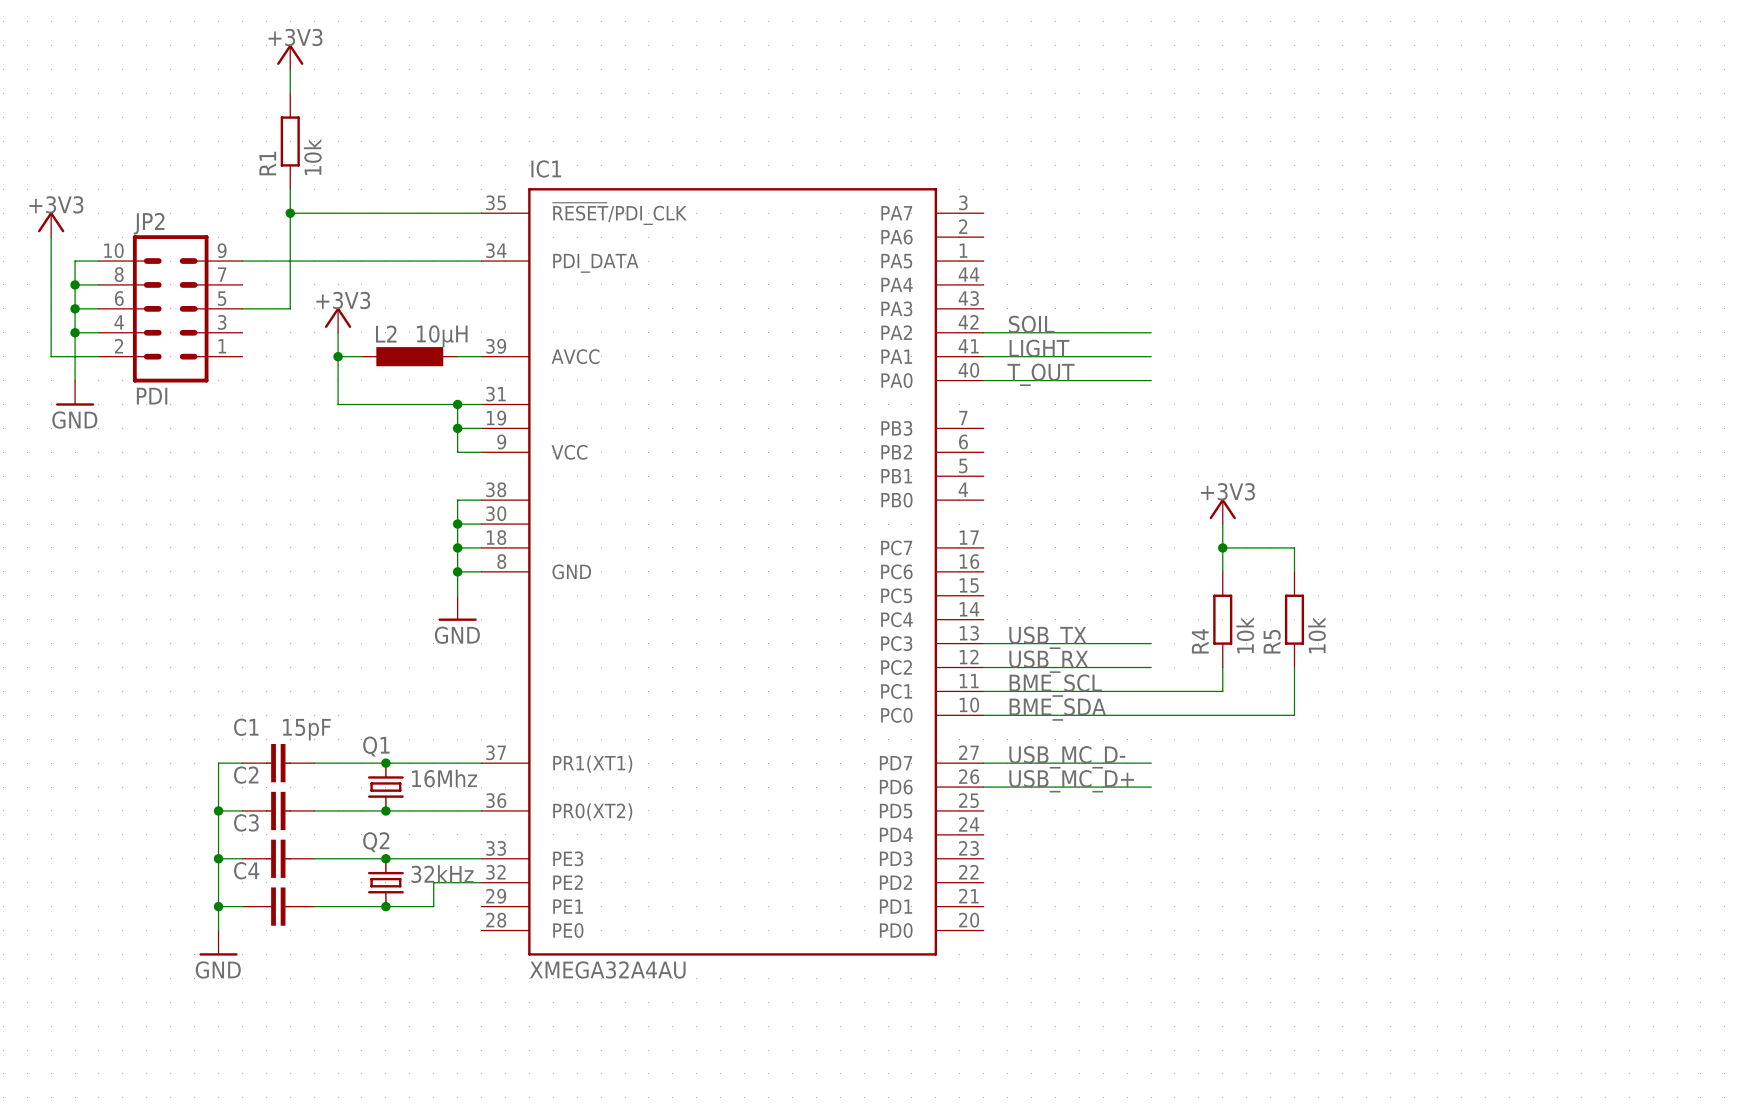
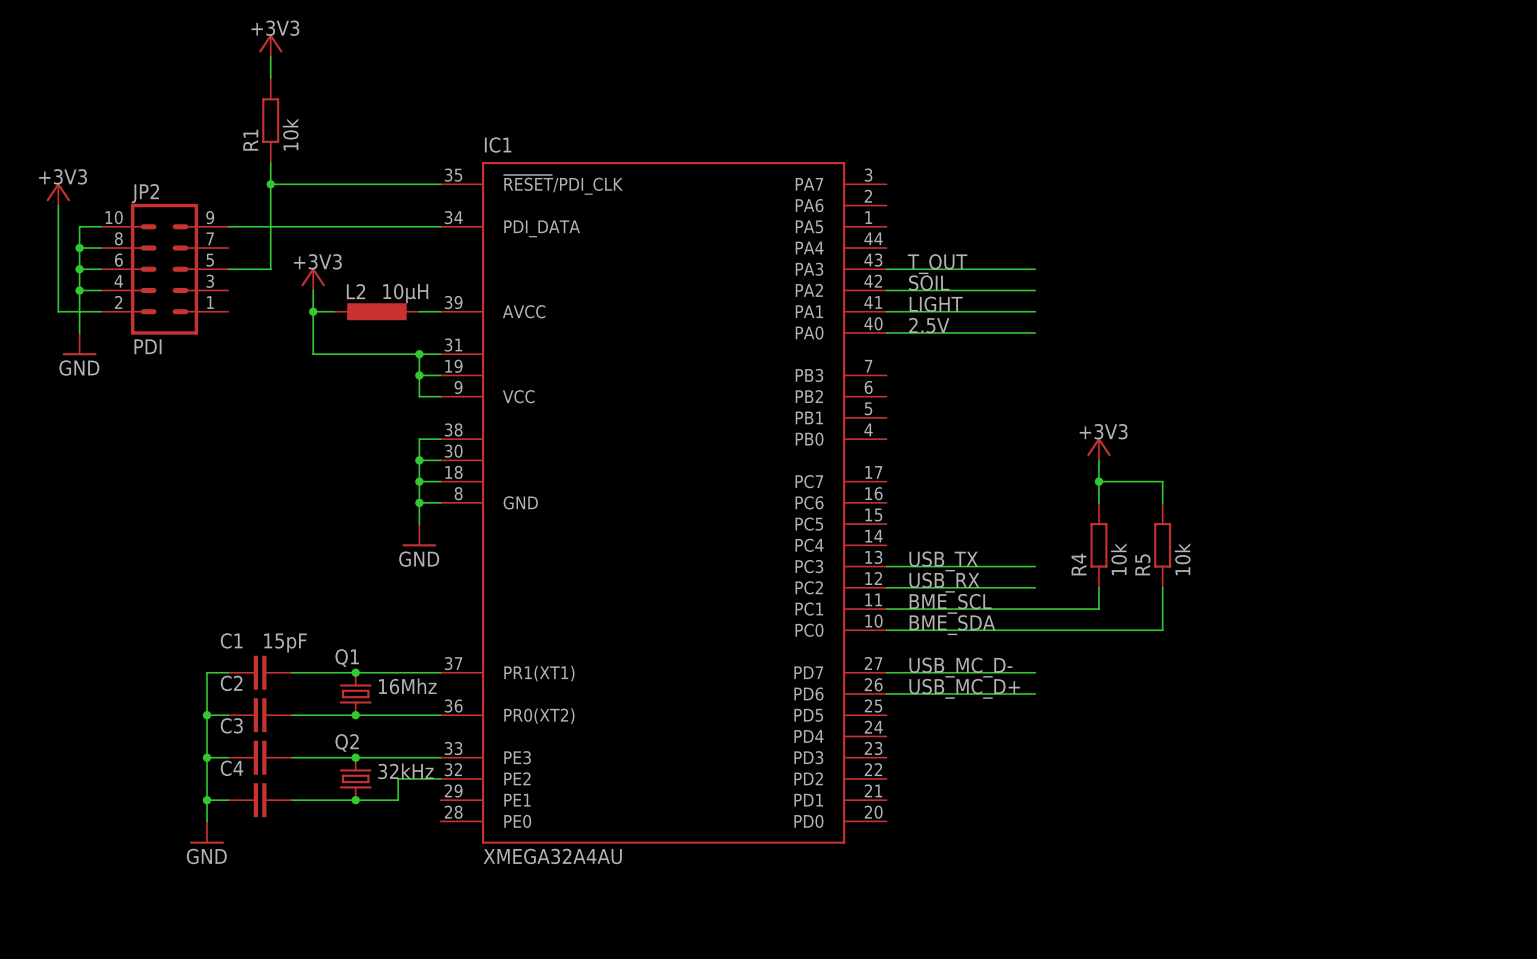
label: none -> T_OUT (937, 264)
wire: none -> (886, 269) (1035, 269)
label: T_OUT (1041, 374) -> 2.5V (929, 325)

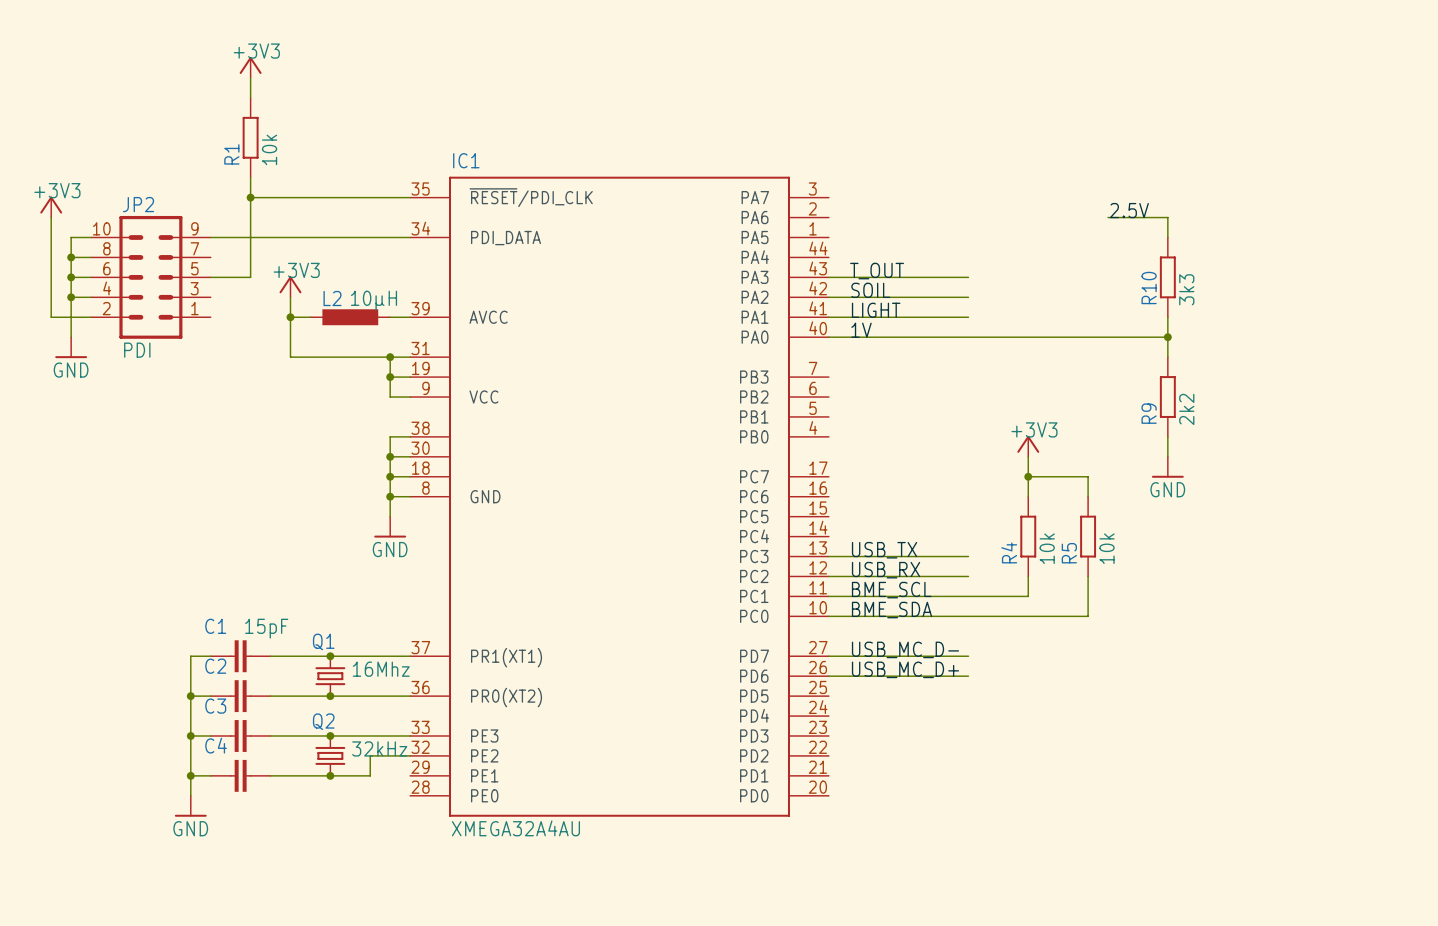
label: none -> 2.5V (1129, 210)
wire: none -> (1108, 217) (1167, 217) (1167, 237)
R10: none -> 3k3 (1167, 277)
wire: none -> (1167, 317) (1167, 357)
label: 2.5V (929, 325) -> 1V (861, 330)
wire: none -> (968, 337) (1167, 337)
junction: none -> (1167, 337)
R9: none -> 2k2 (1167, 397)
wire: none -> (1167, 436) (1167, 456)
power symbol: none -> GND (1167, 467)

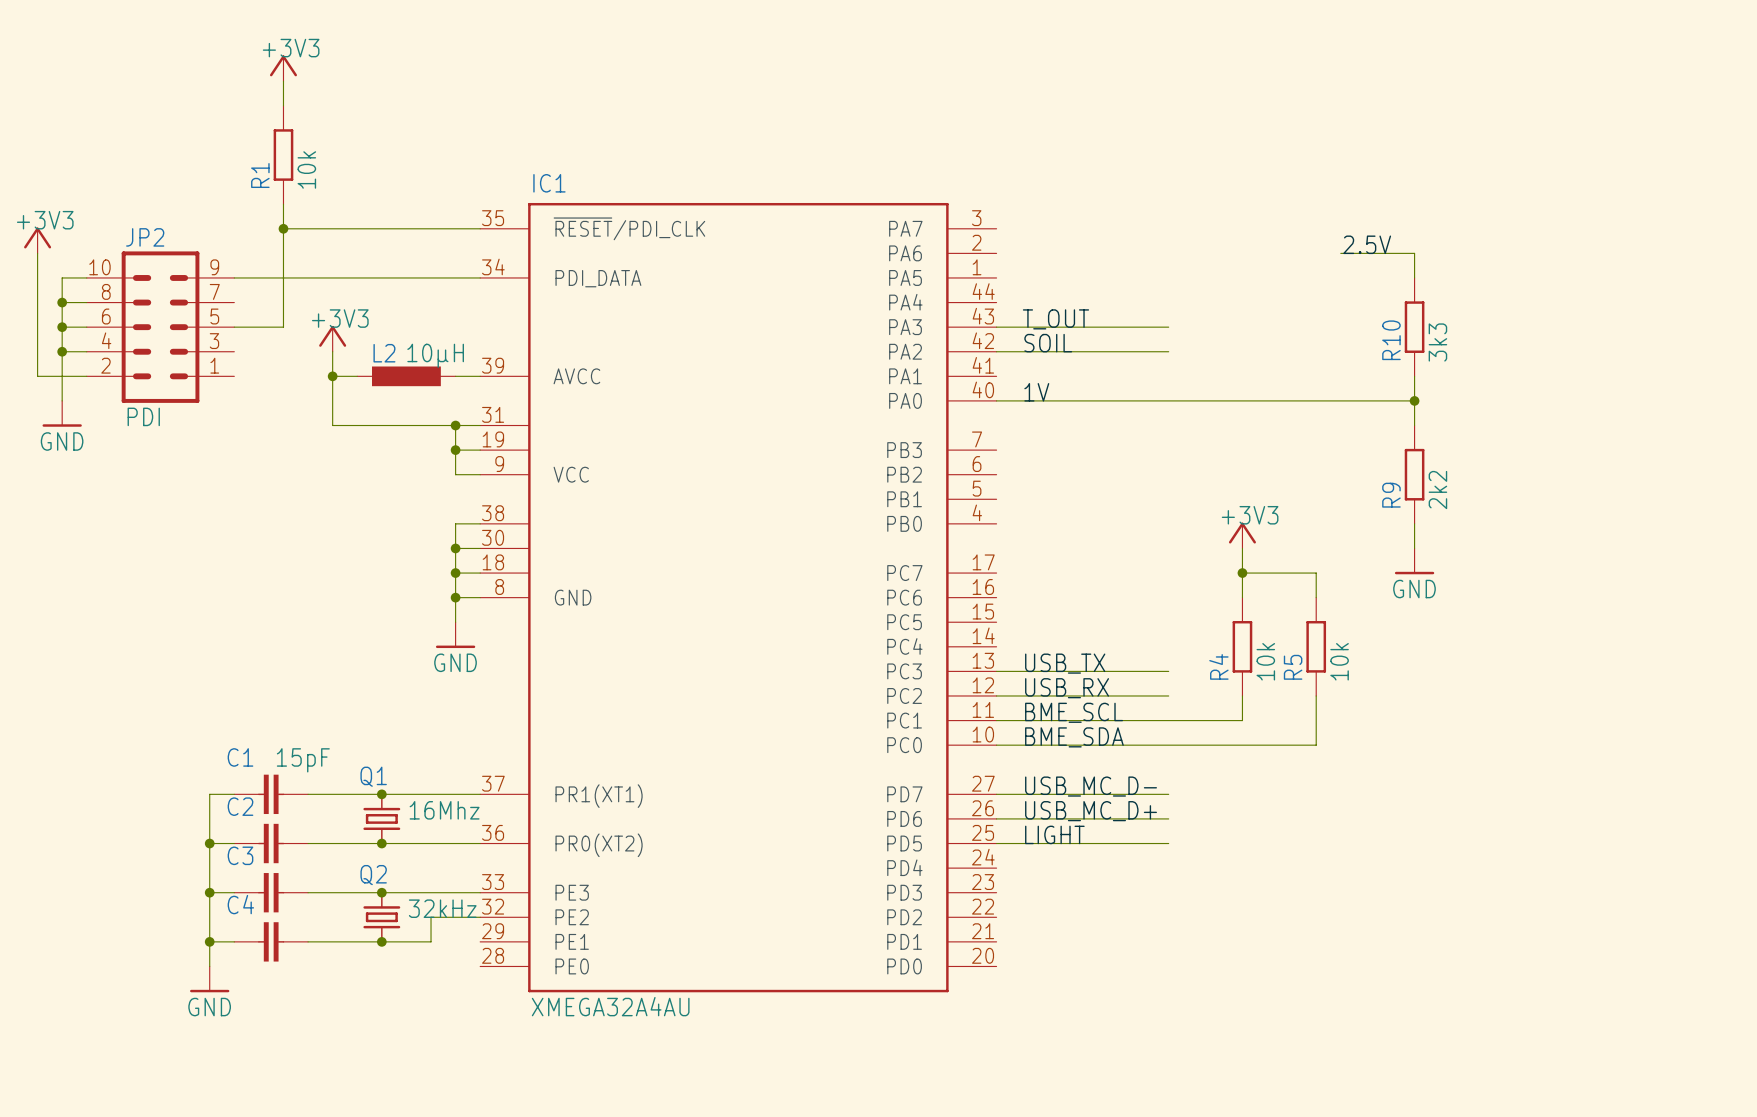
label: LIGHT (876, 310) -> none
wire: (828, 317) (968, 317) -> none
label: none -> LIGHT (1054, 834)
wire: none -> (996, 843) (1168, 843)

